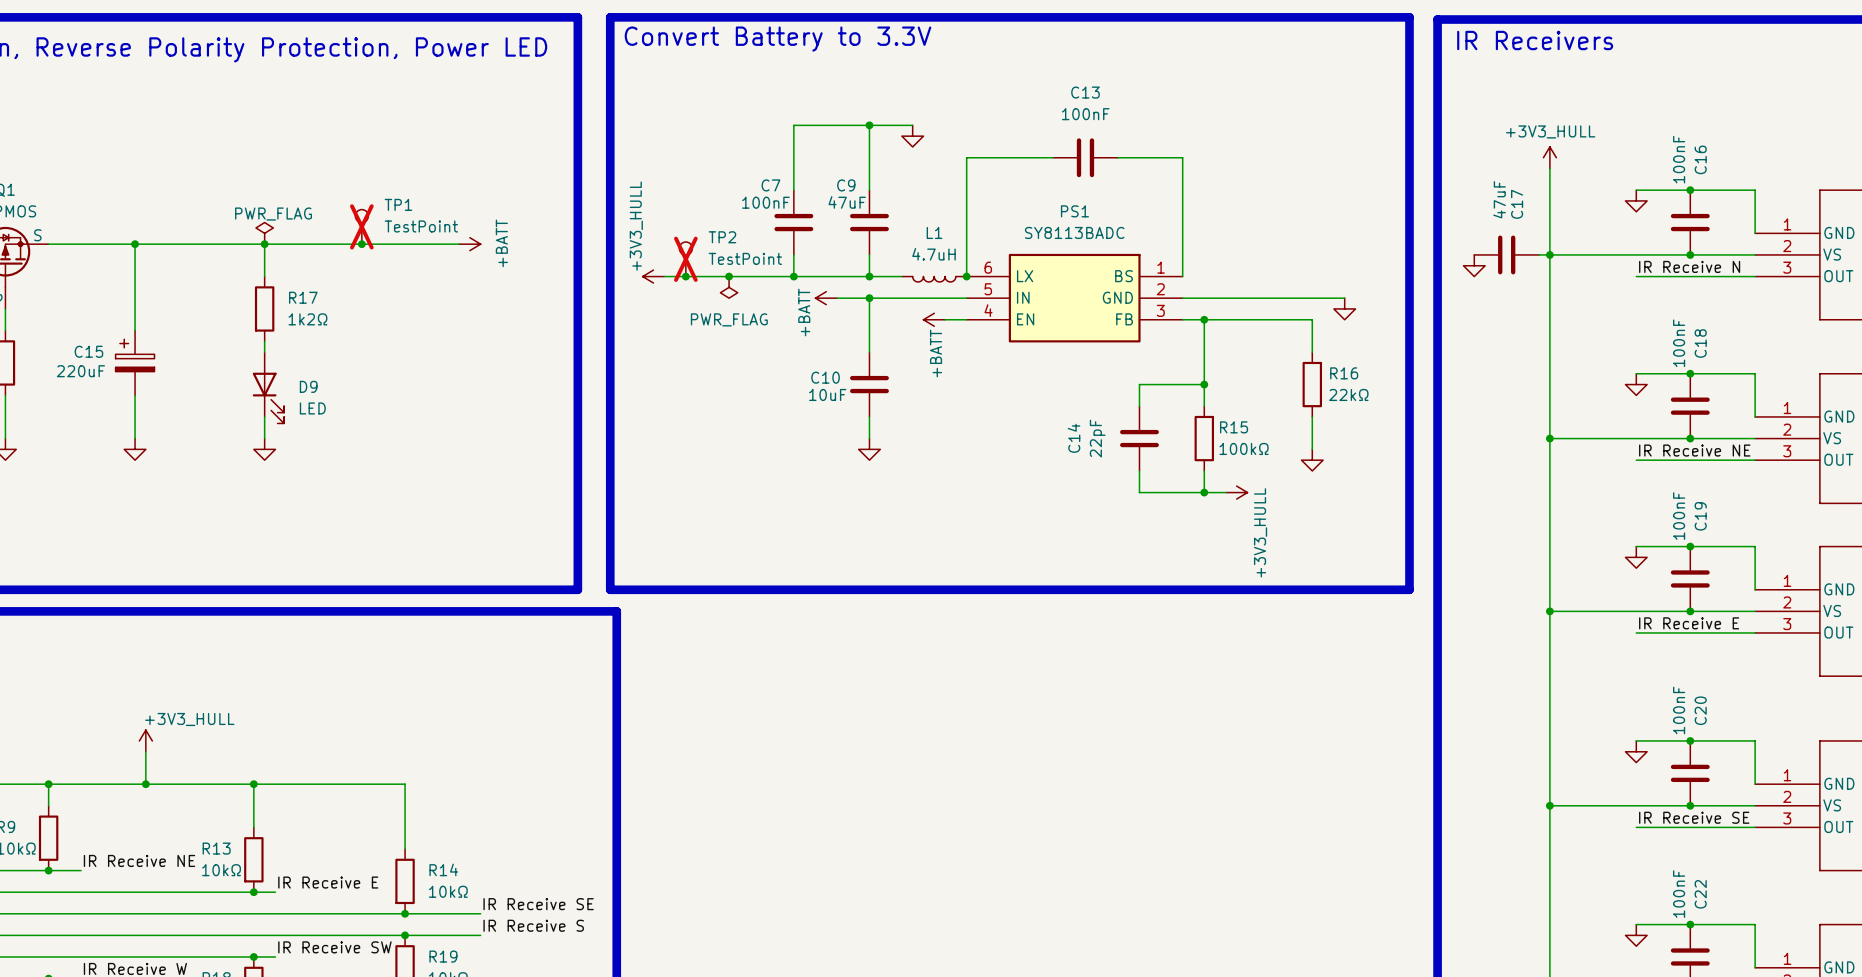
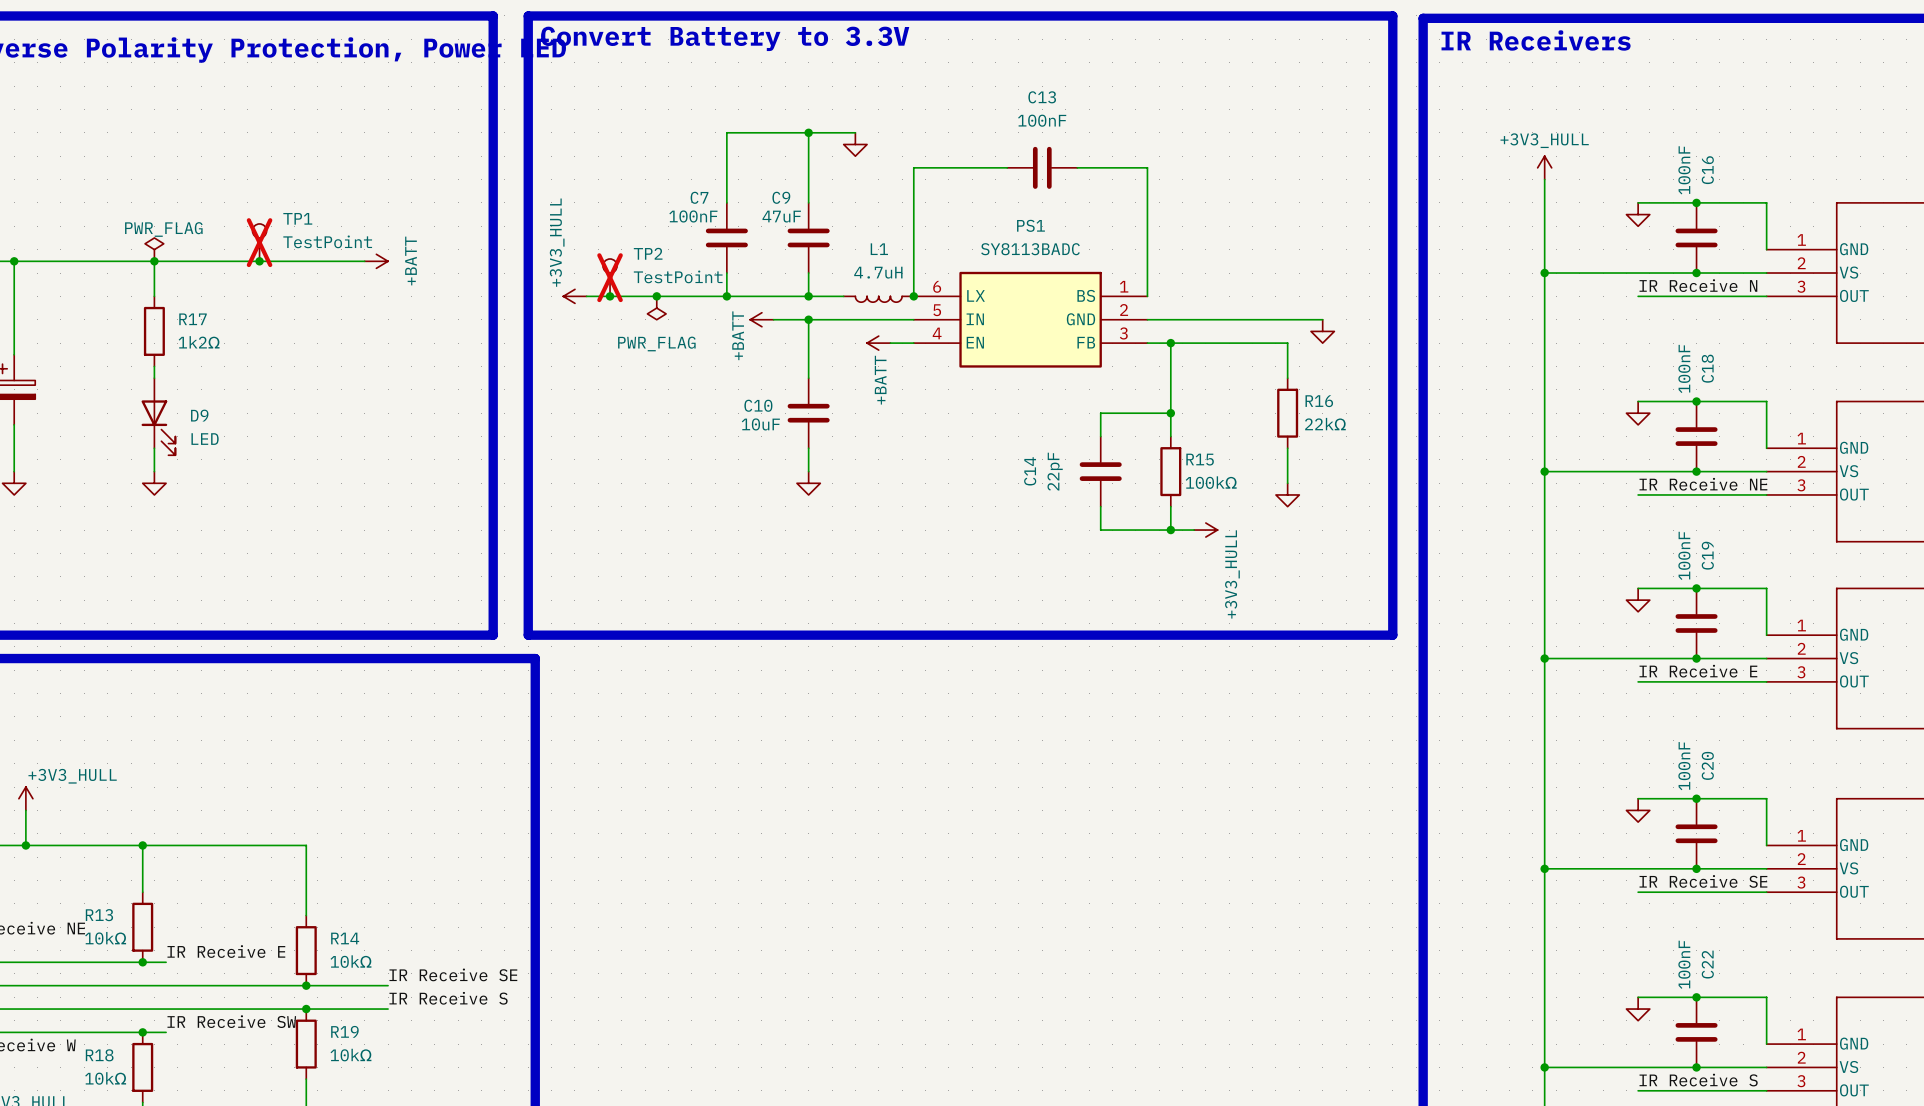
C17: 47uF (1506, 254) -> none
wire: (1539, 254) (1549, 254) -> none
power symbol: (1474, 265) -> none

